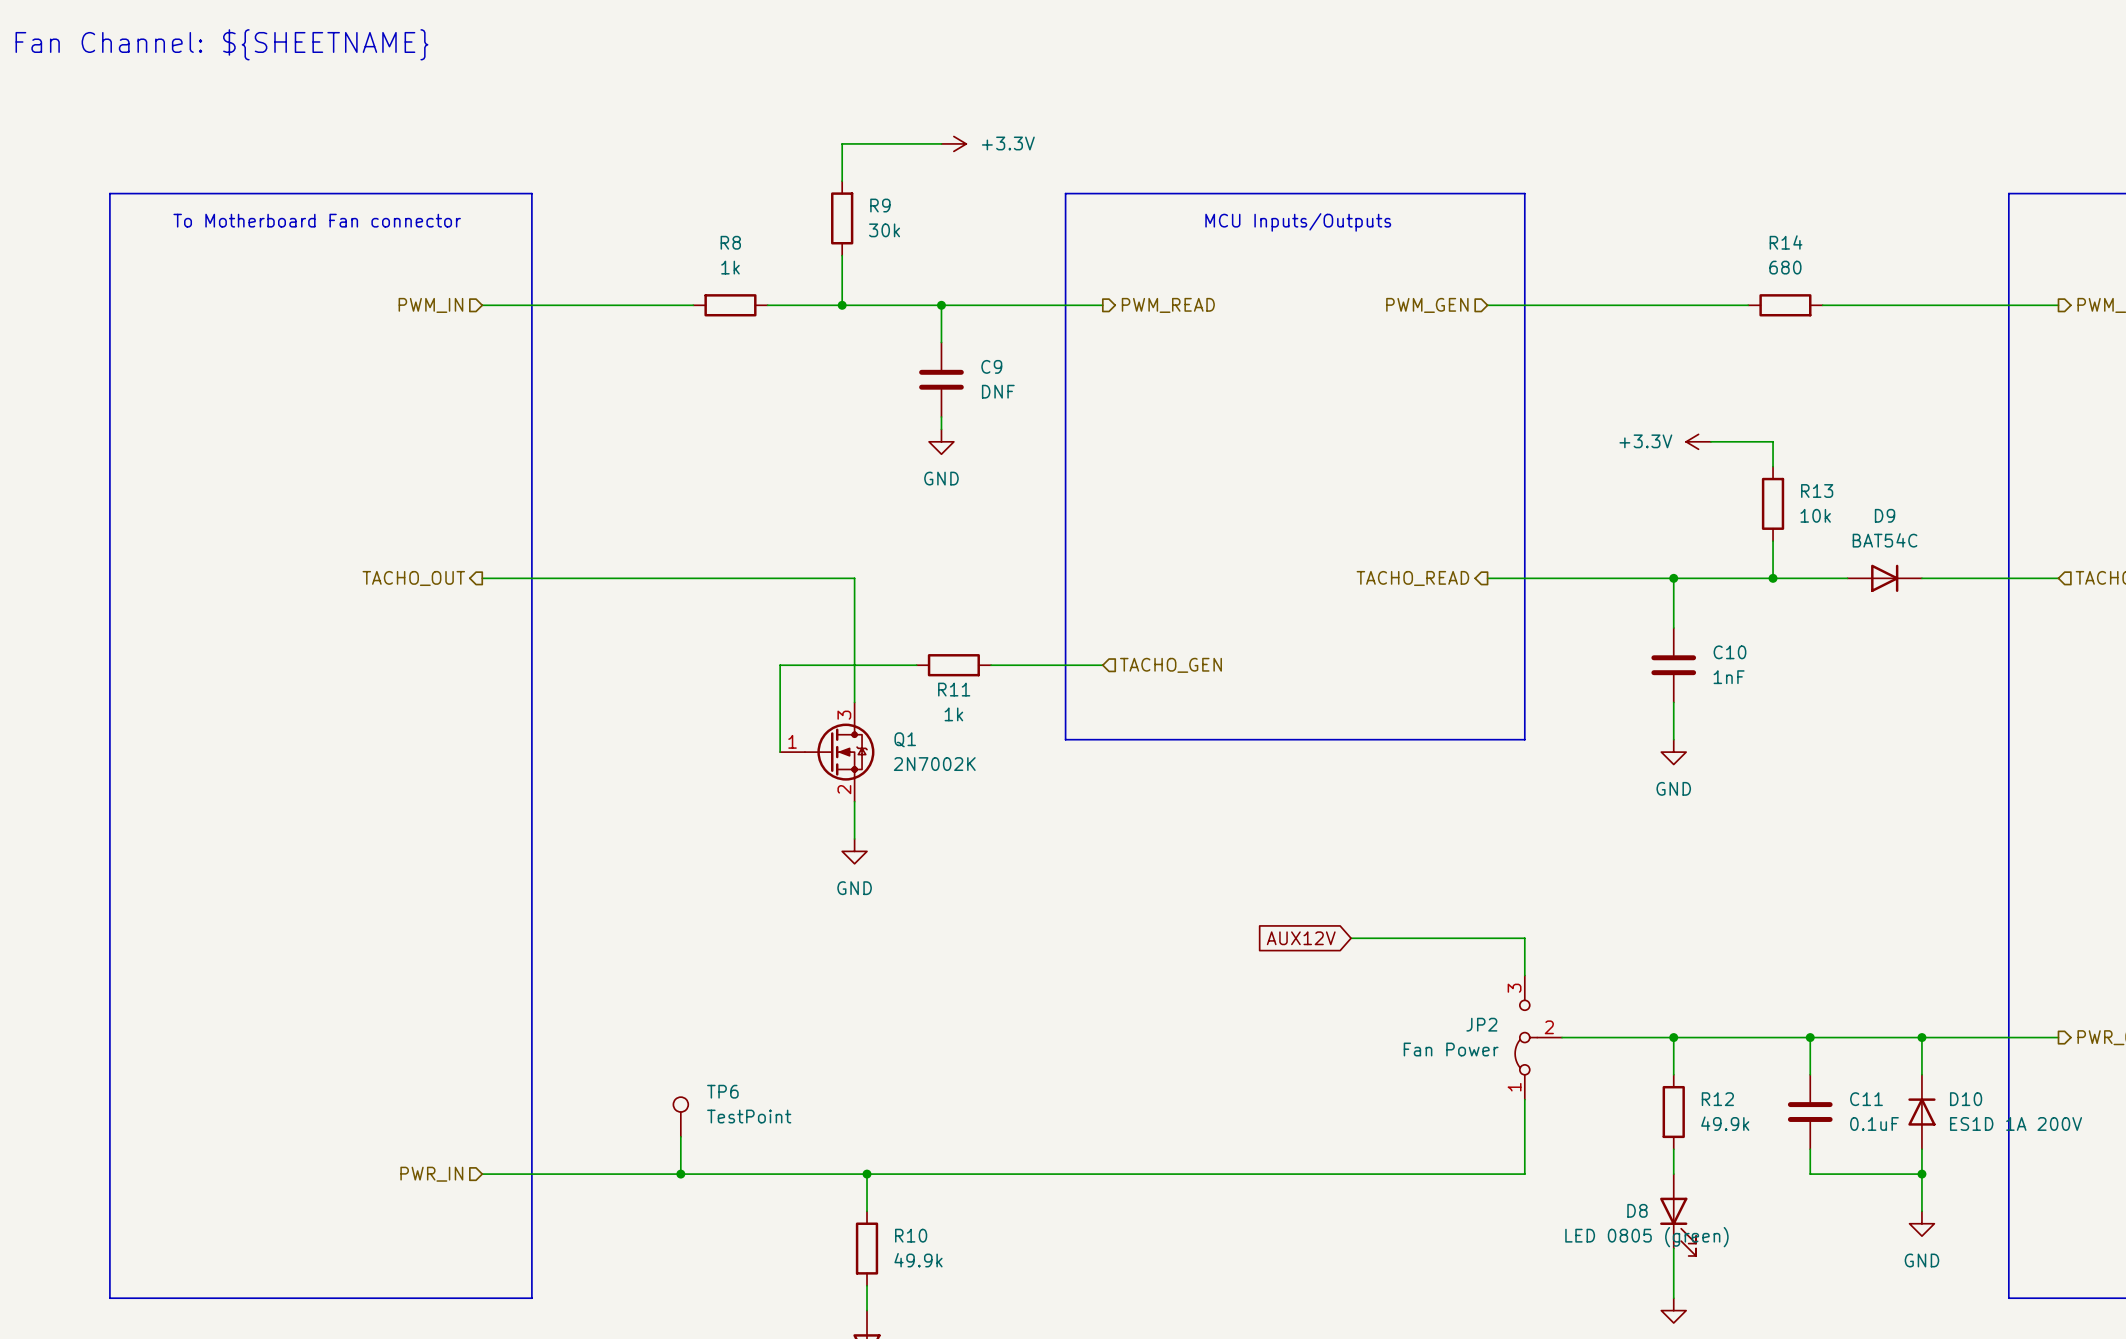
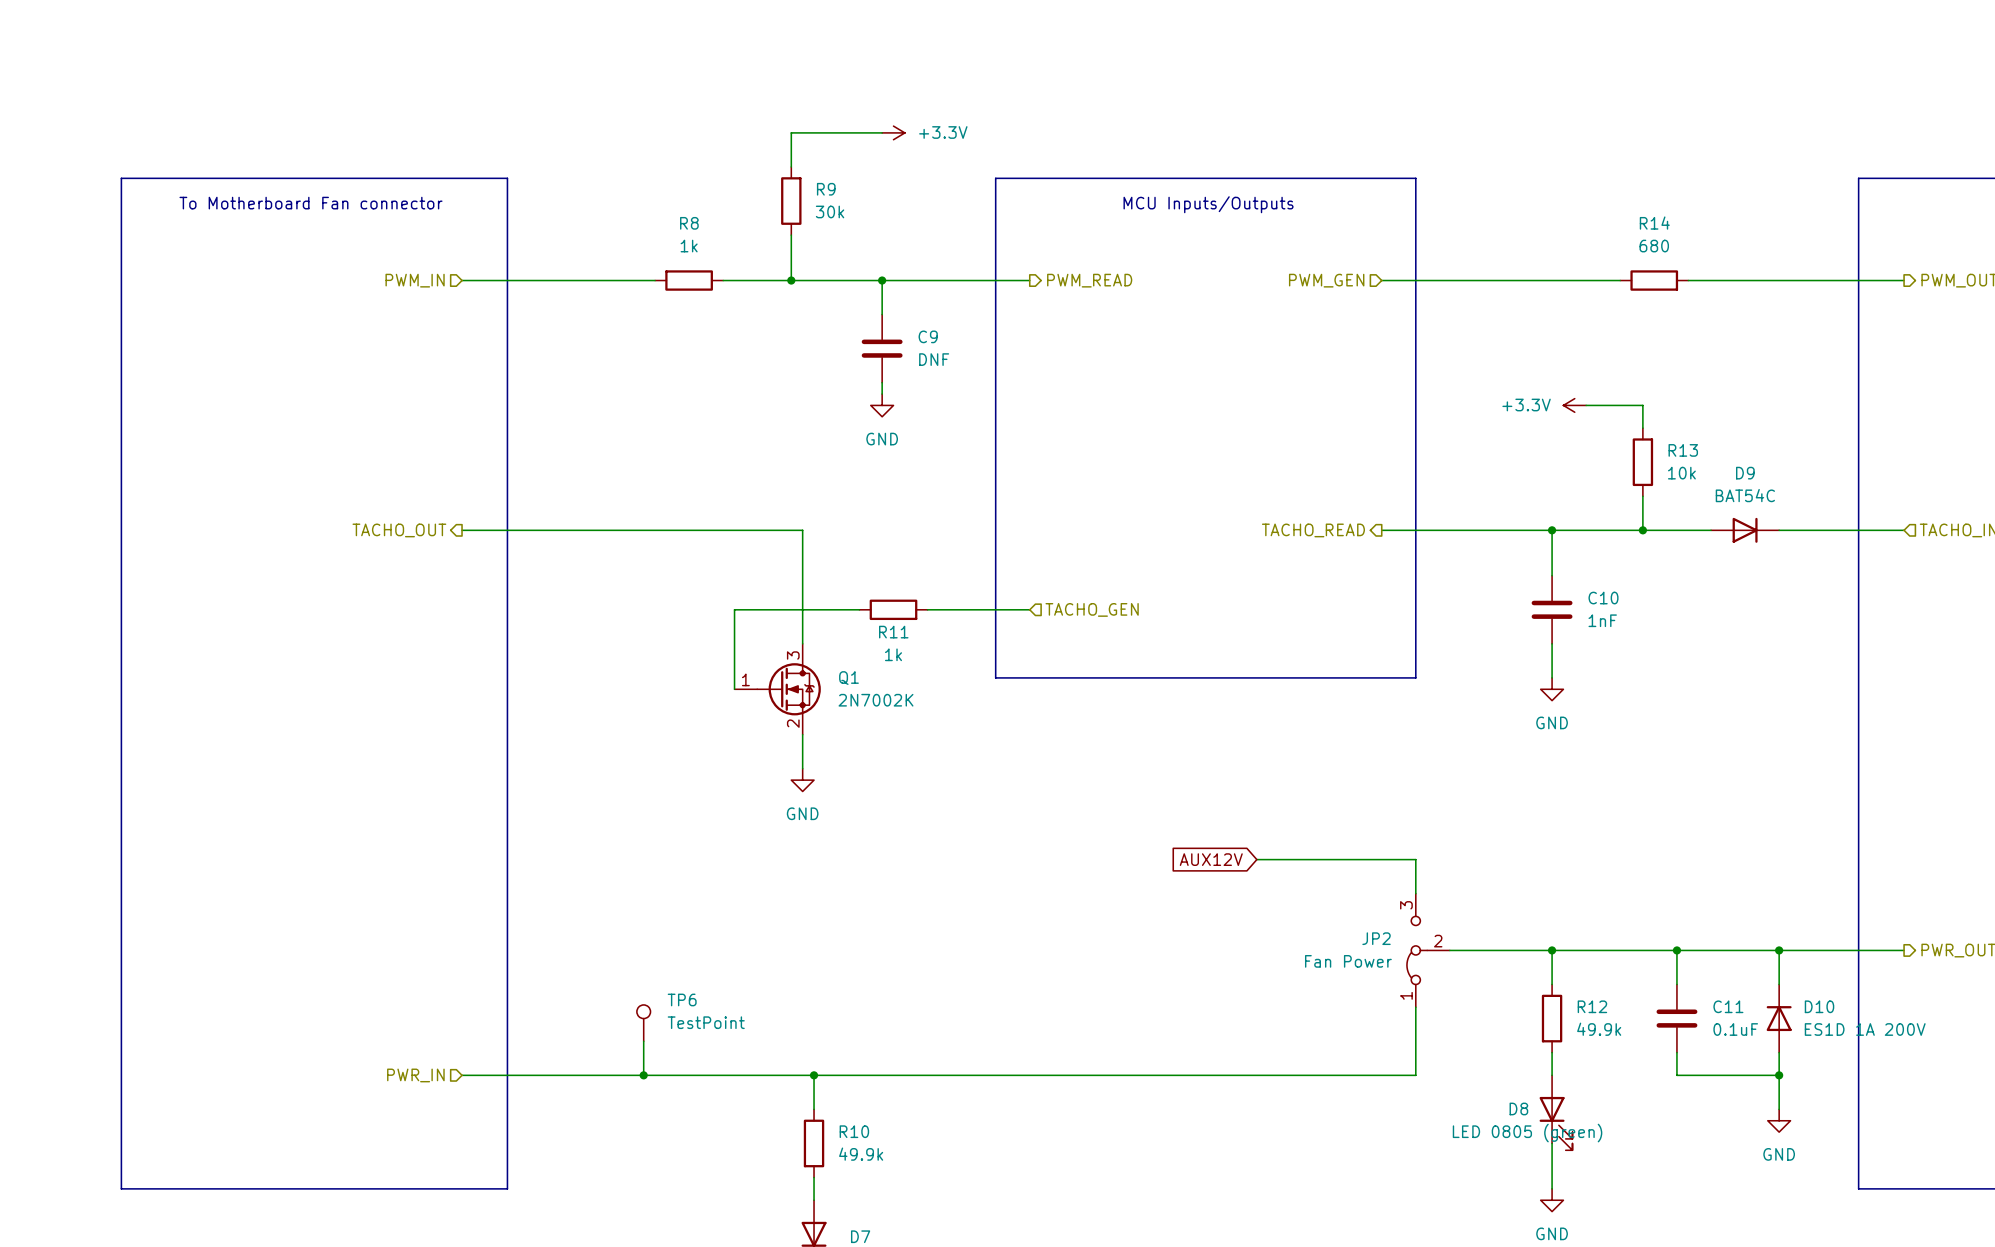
text: Fan Channel: ${SHEETNAME} (221, 44) -> none

